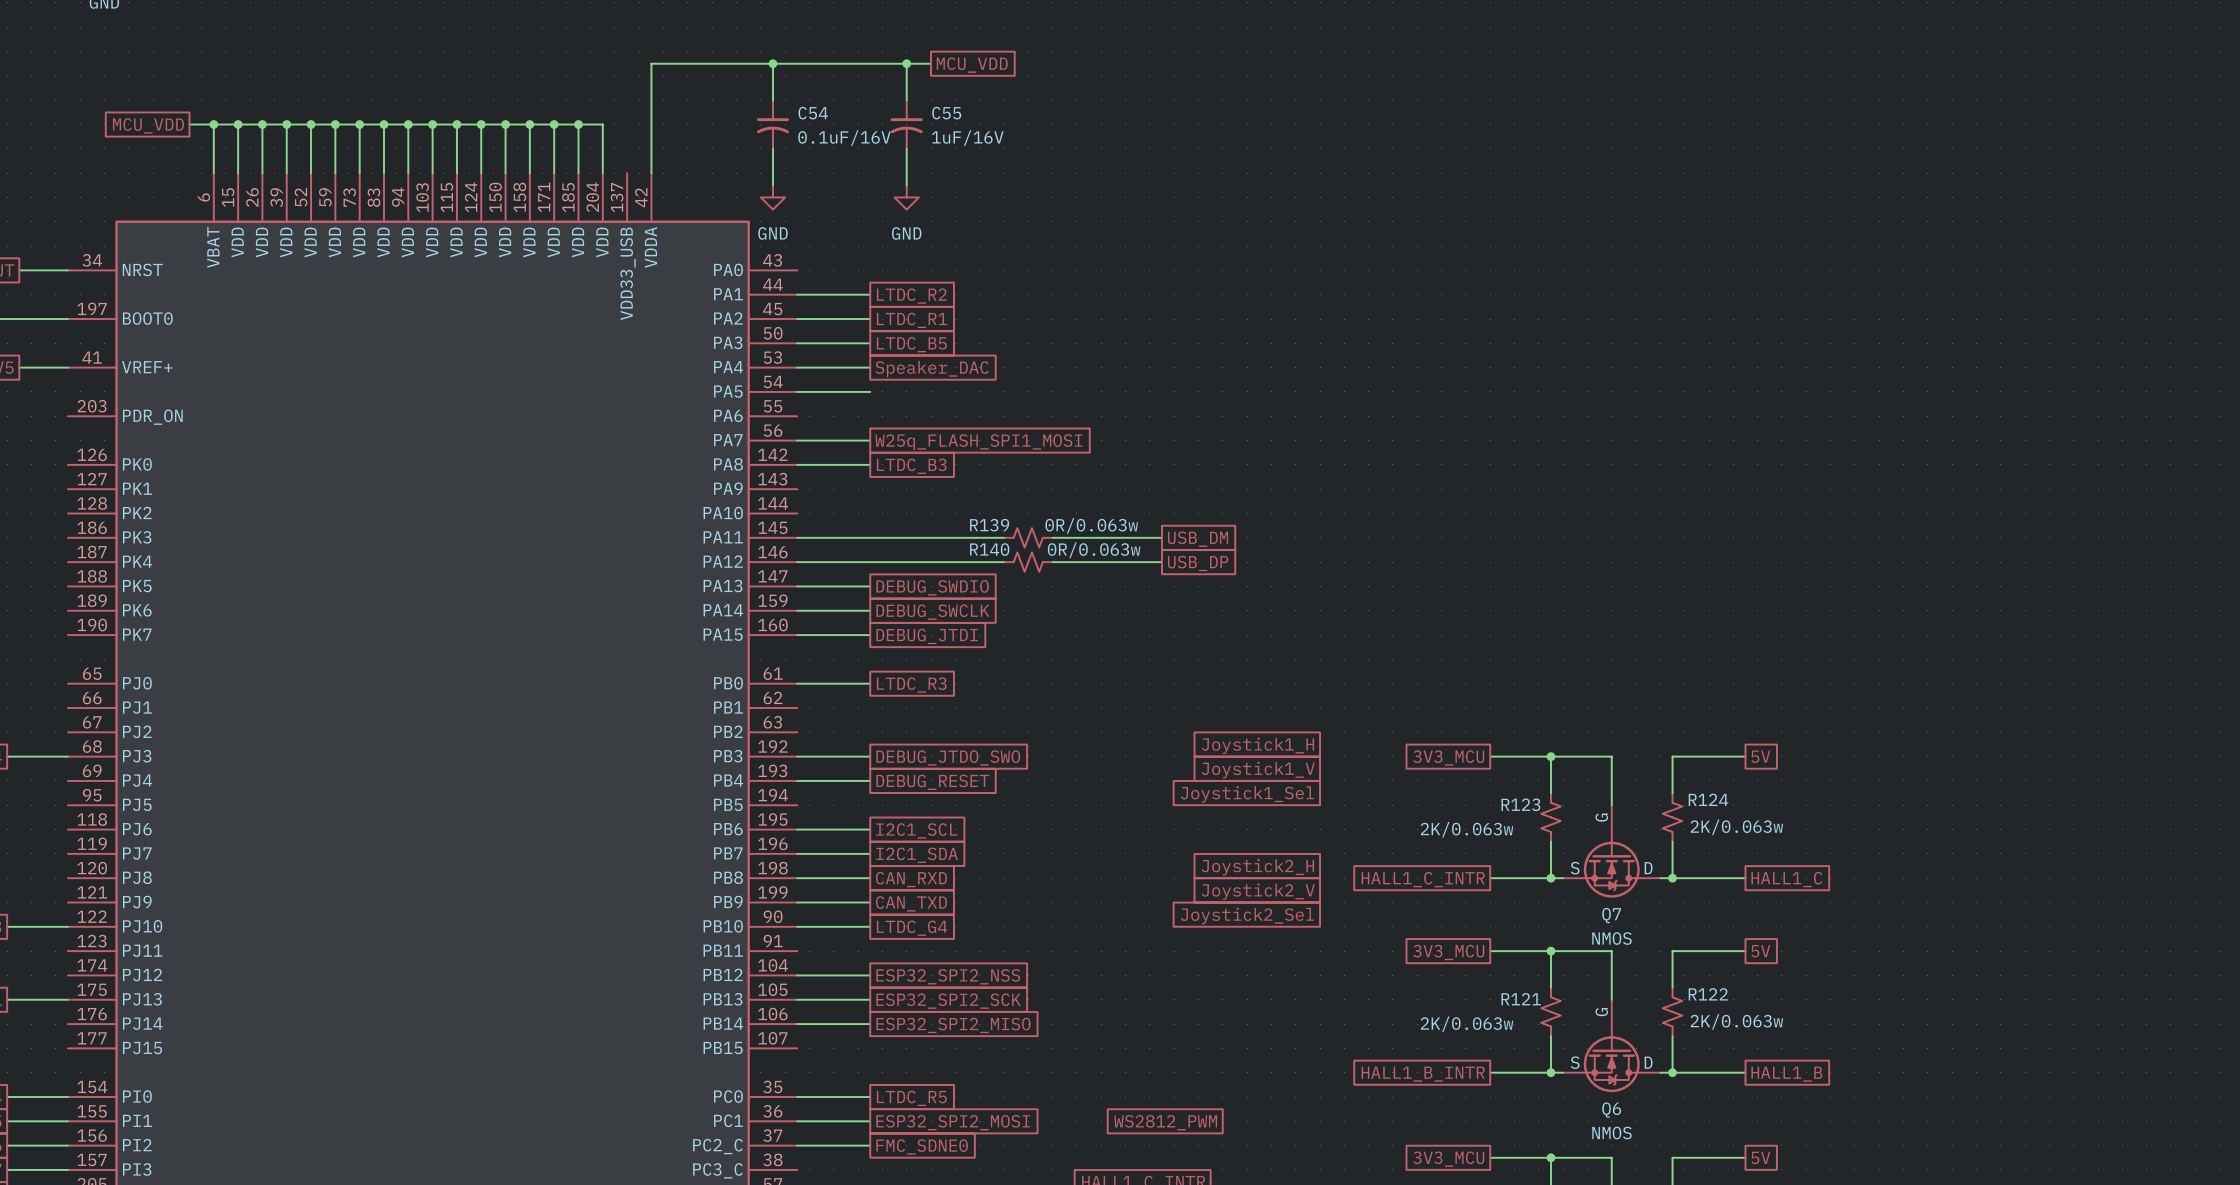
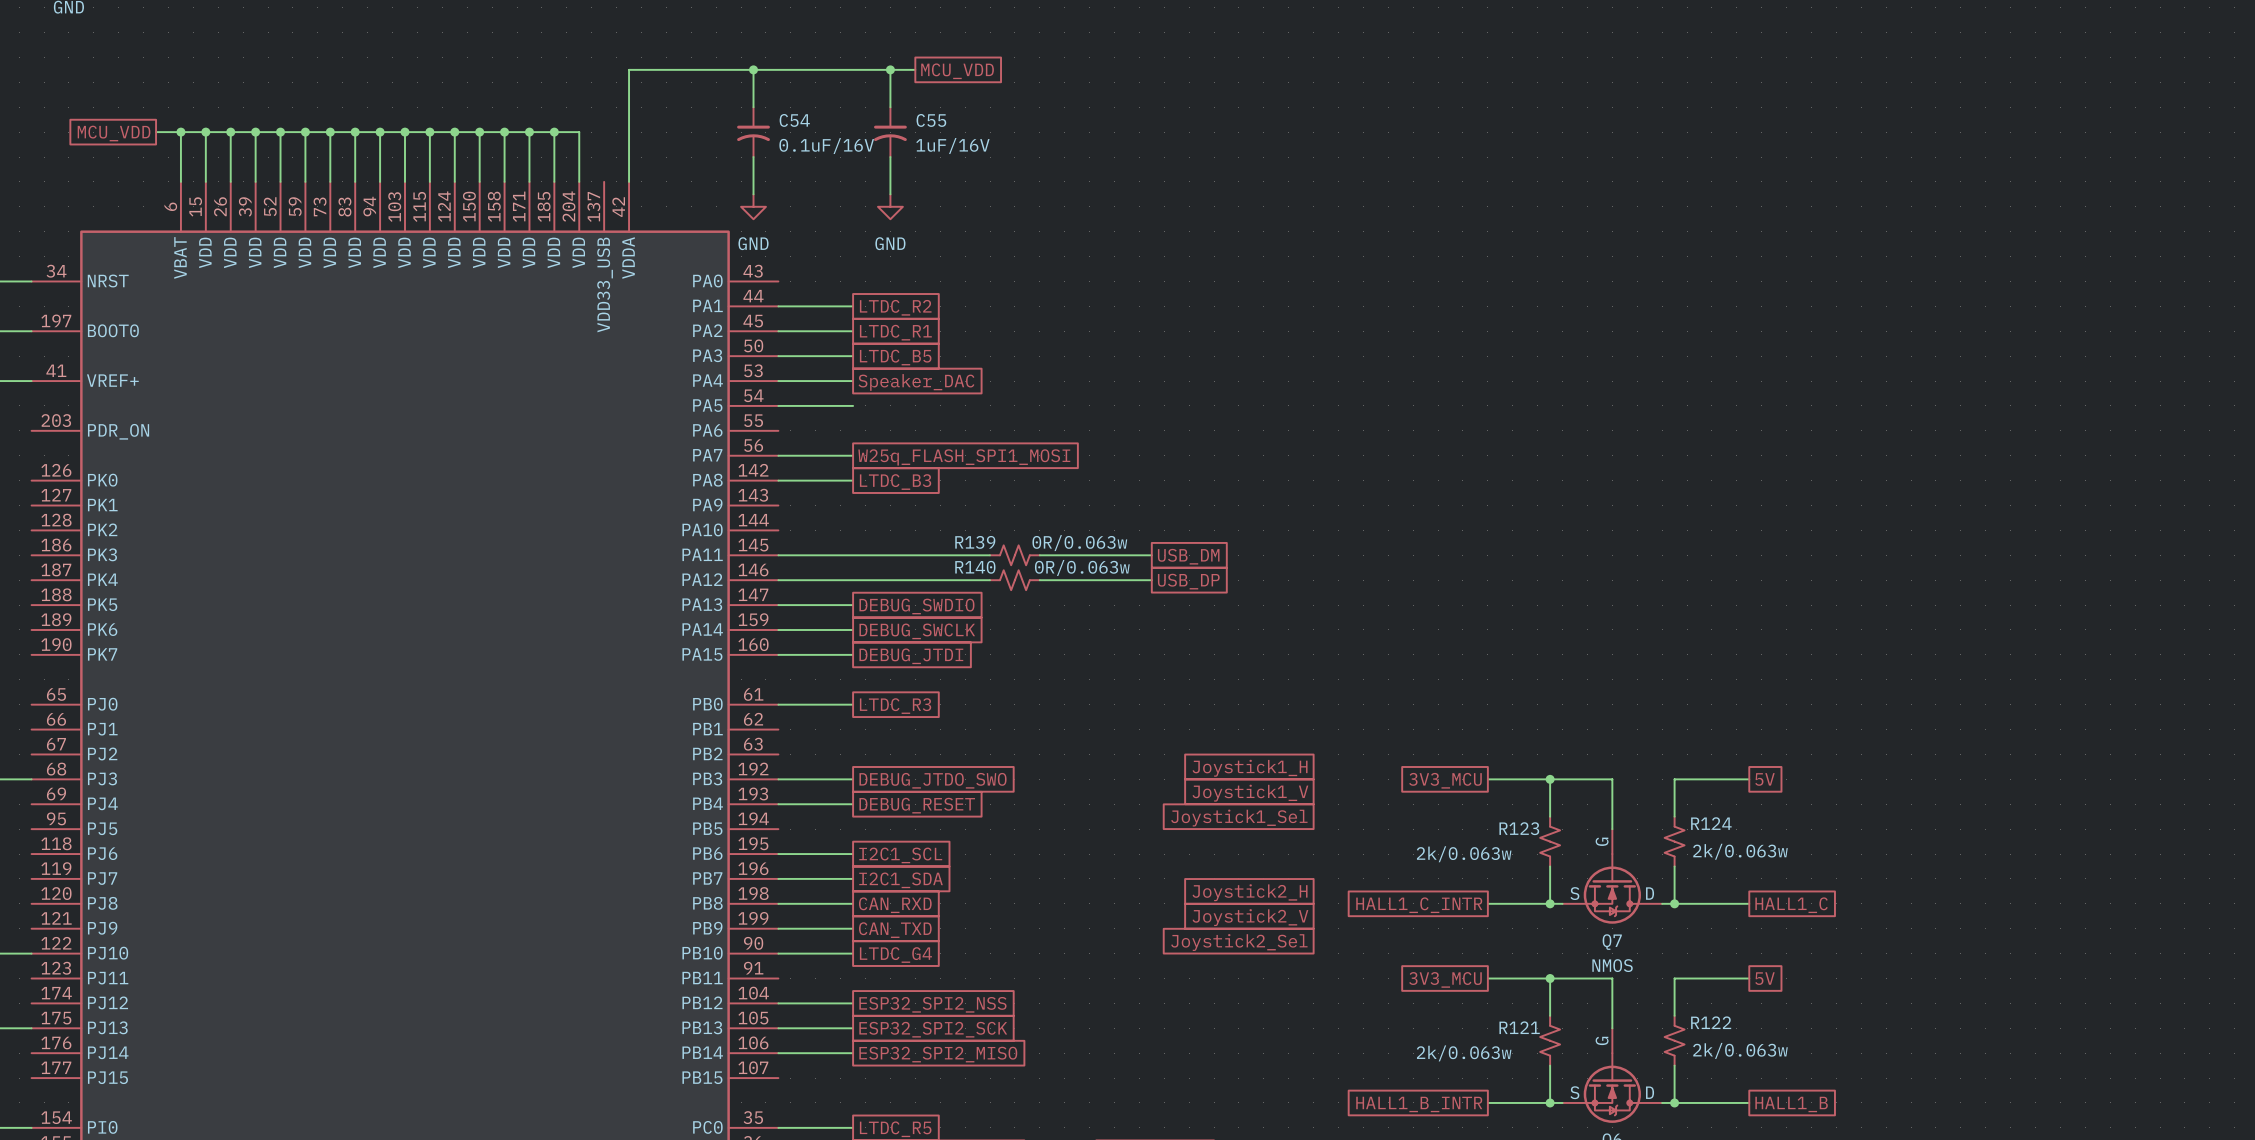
R124 value: 2K/0.063w (1736, 827) -> 2k/0.063w (1740, 851)
R123 value: 2K/0.063w (1467, 829) -> 2k/0.063w (1464, 854)
R122 value: 2K/0.063w (1736, 1021) -> 2k/0.063w (1740, 1050)
R121 value: 2K/0.063w (1467, 1024) -> 2k/0.063w (1464, 1053)

